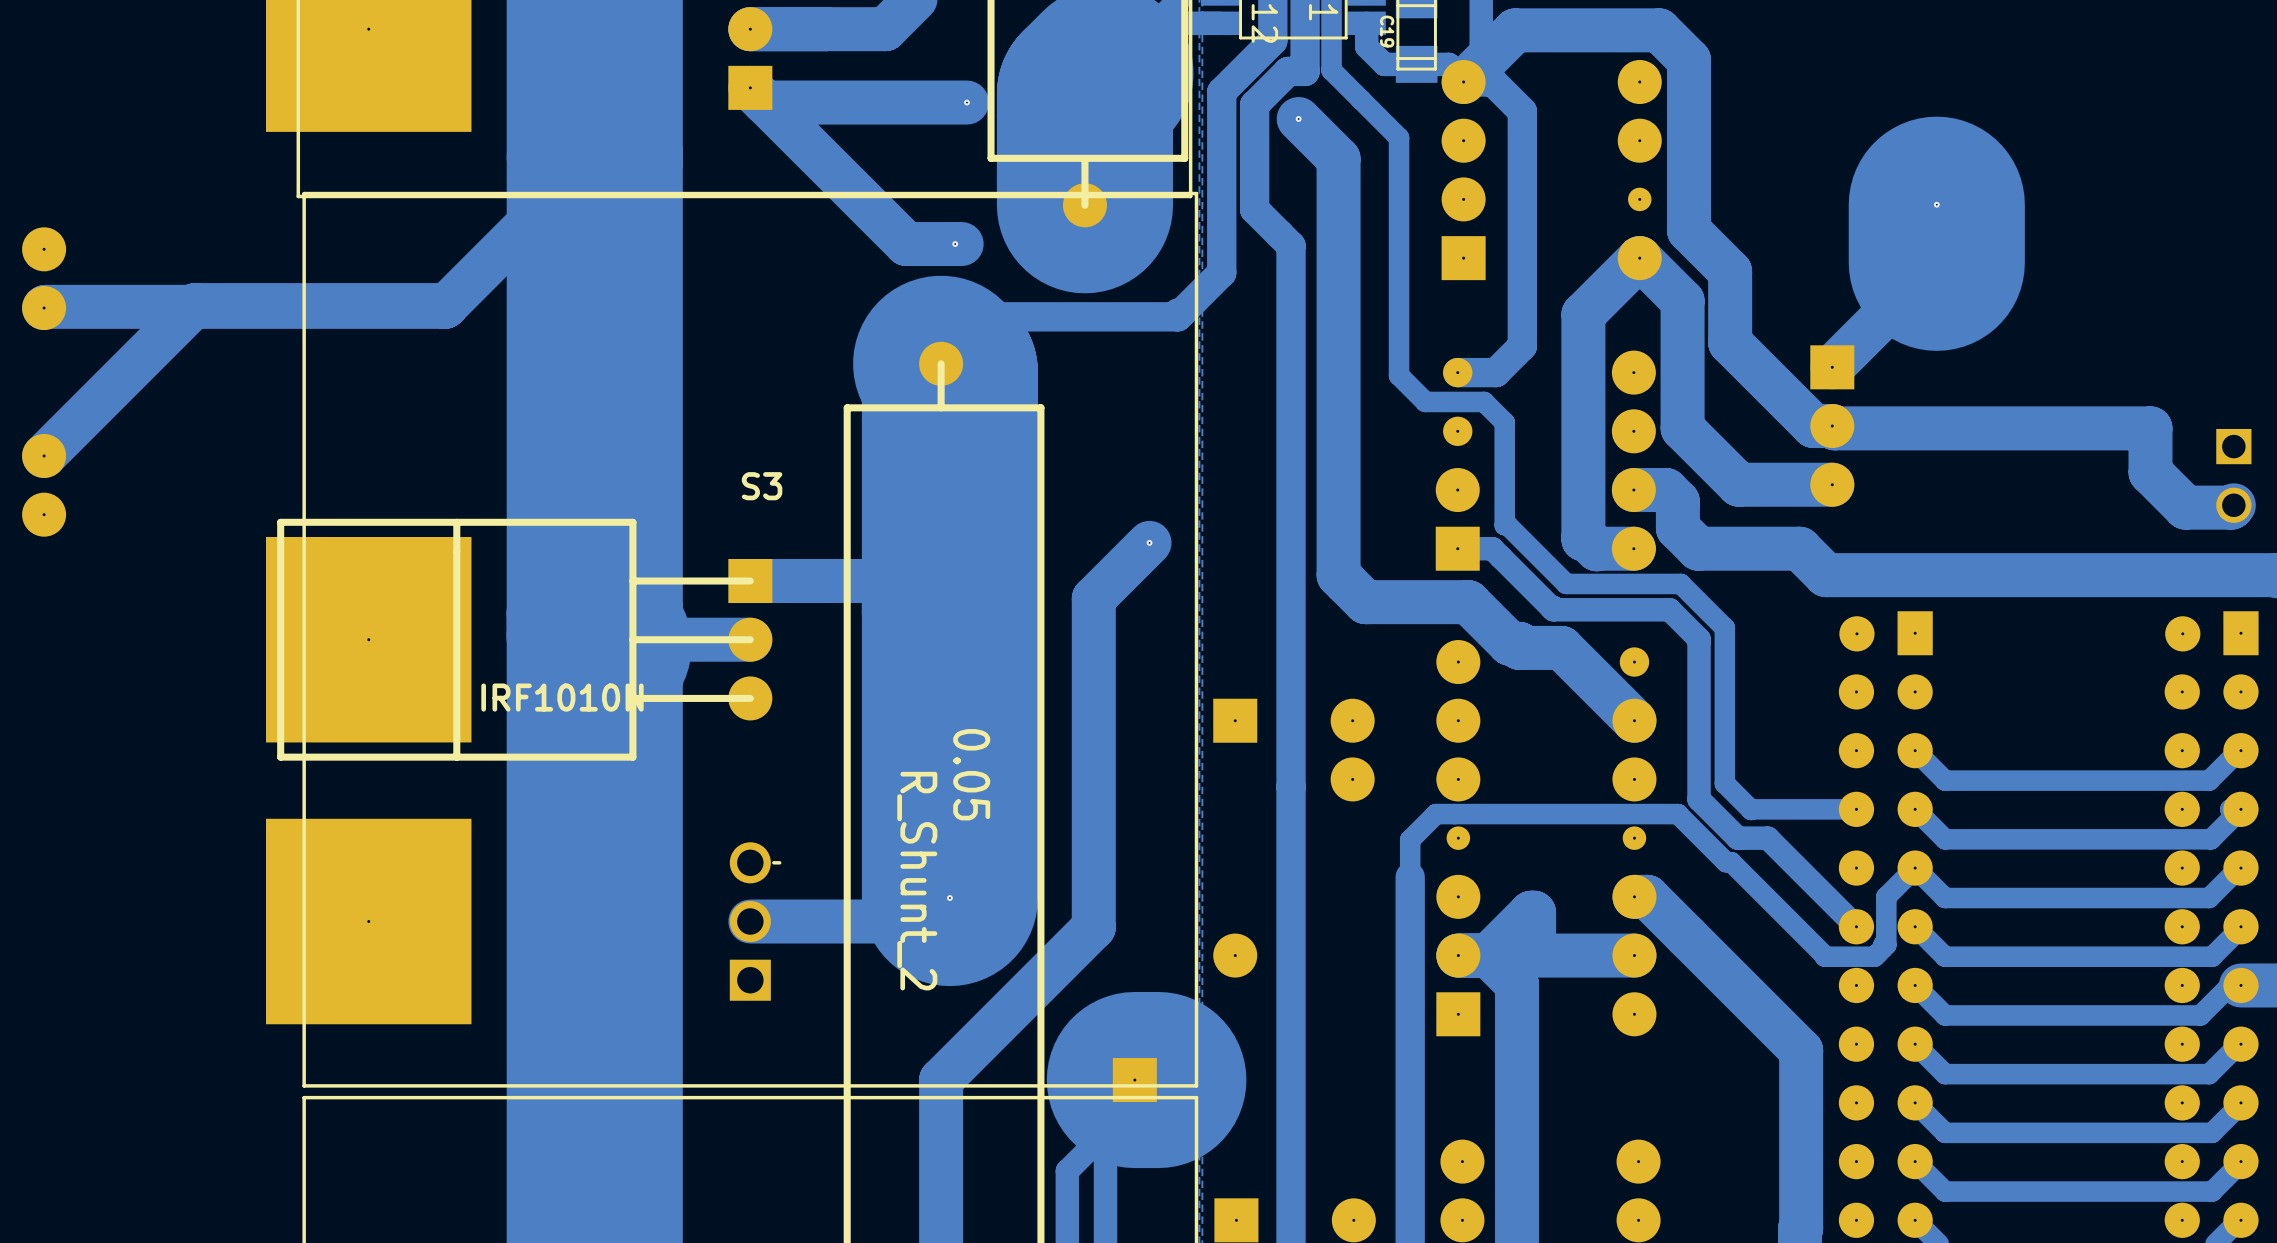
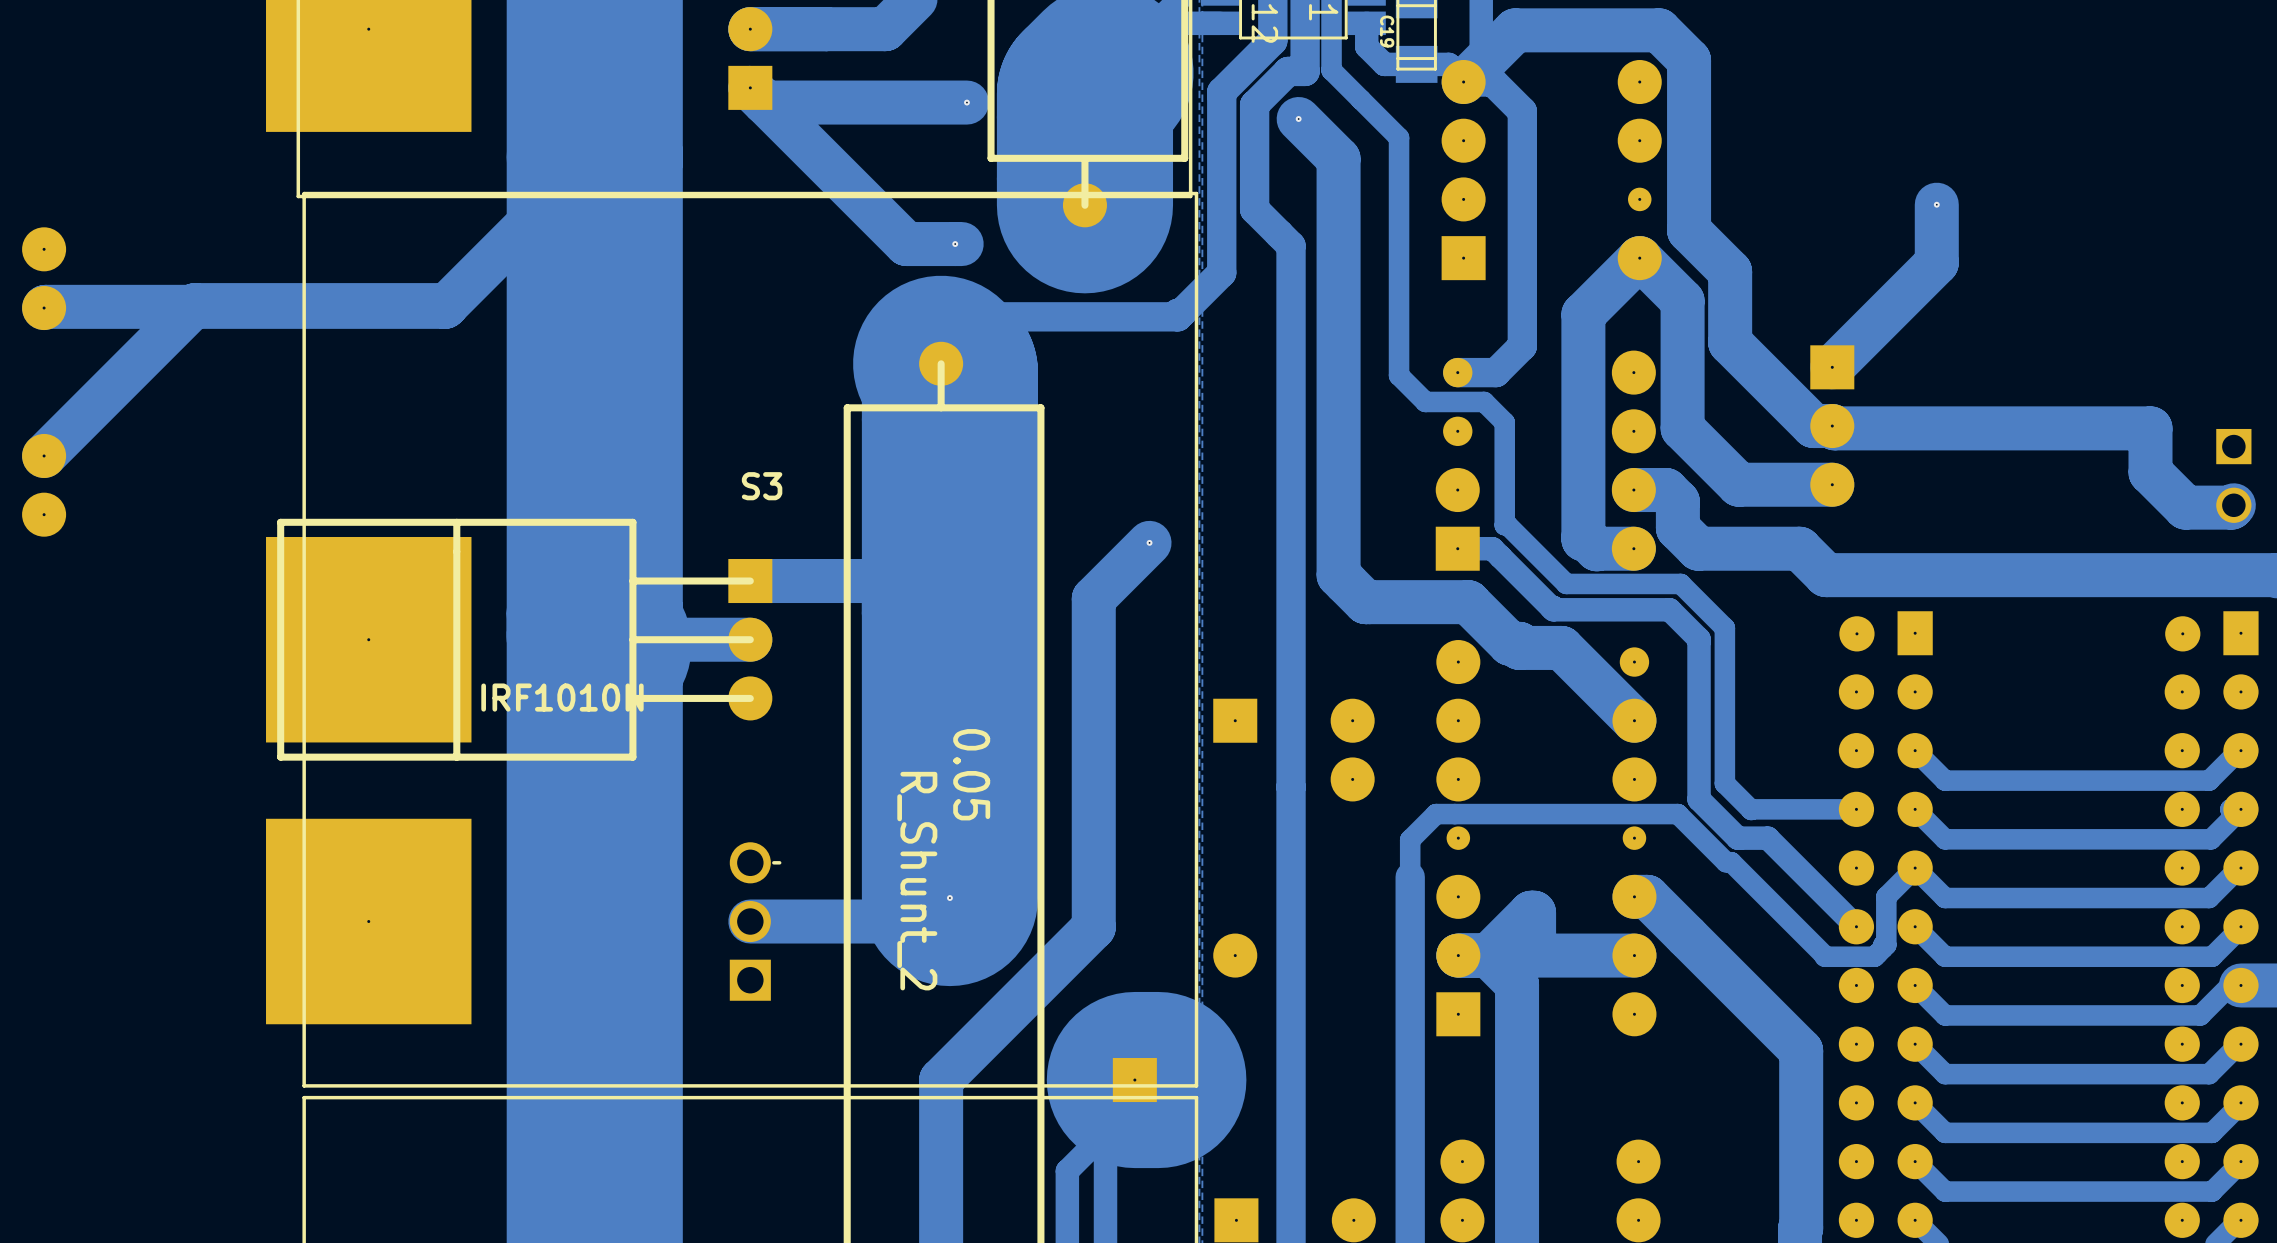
track width: thick (1936, 204) (1936, 262) -> thin (1936, 204) (1936, 262)

